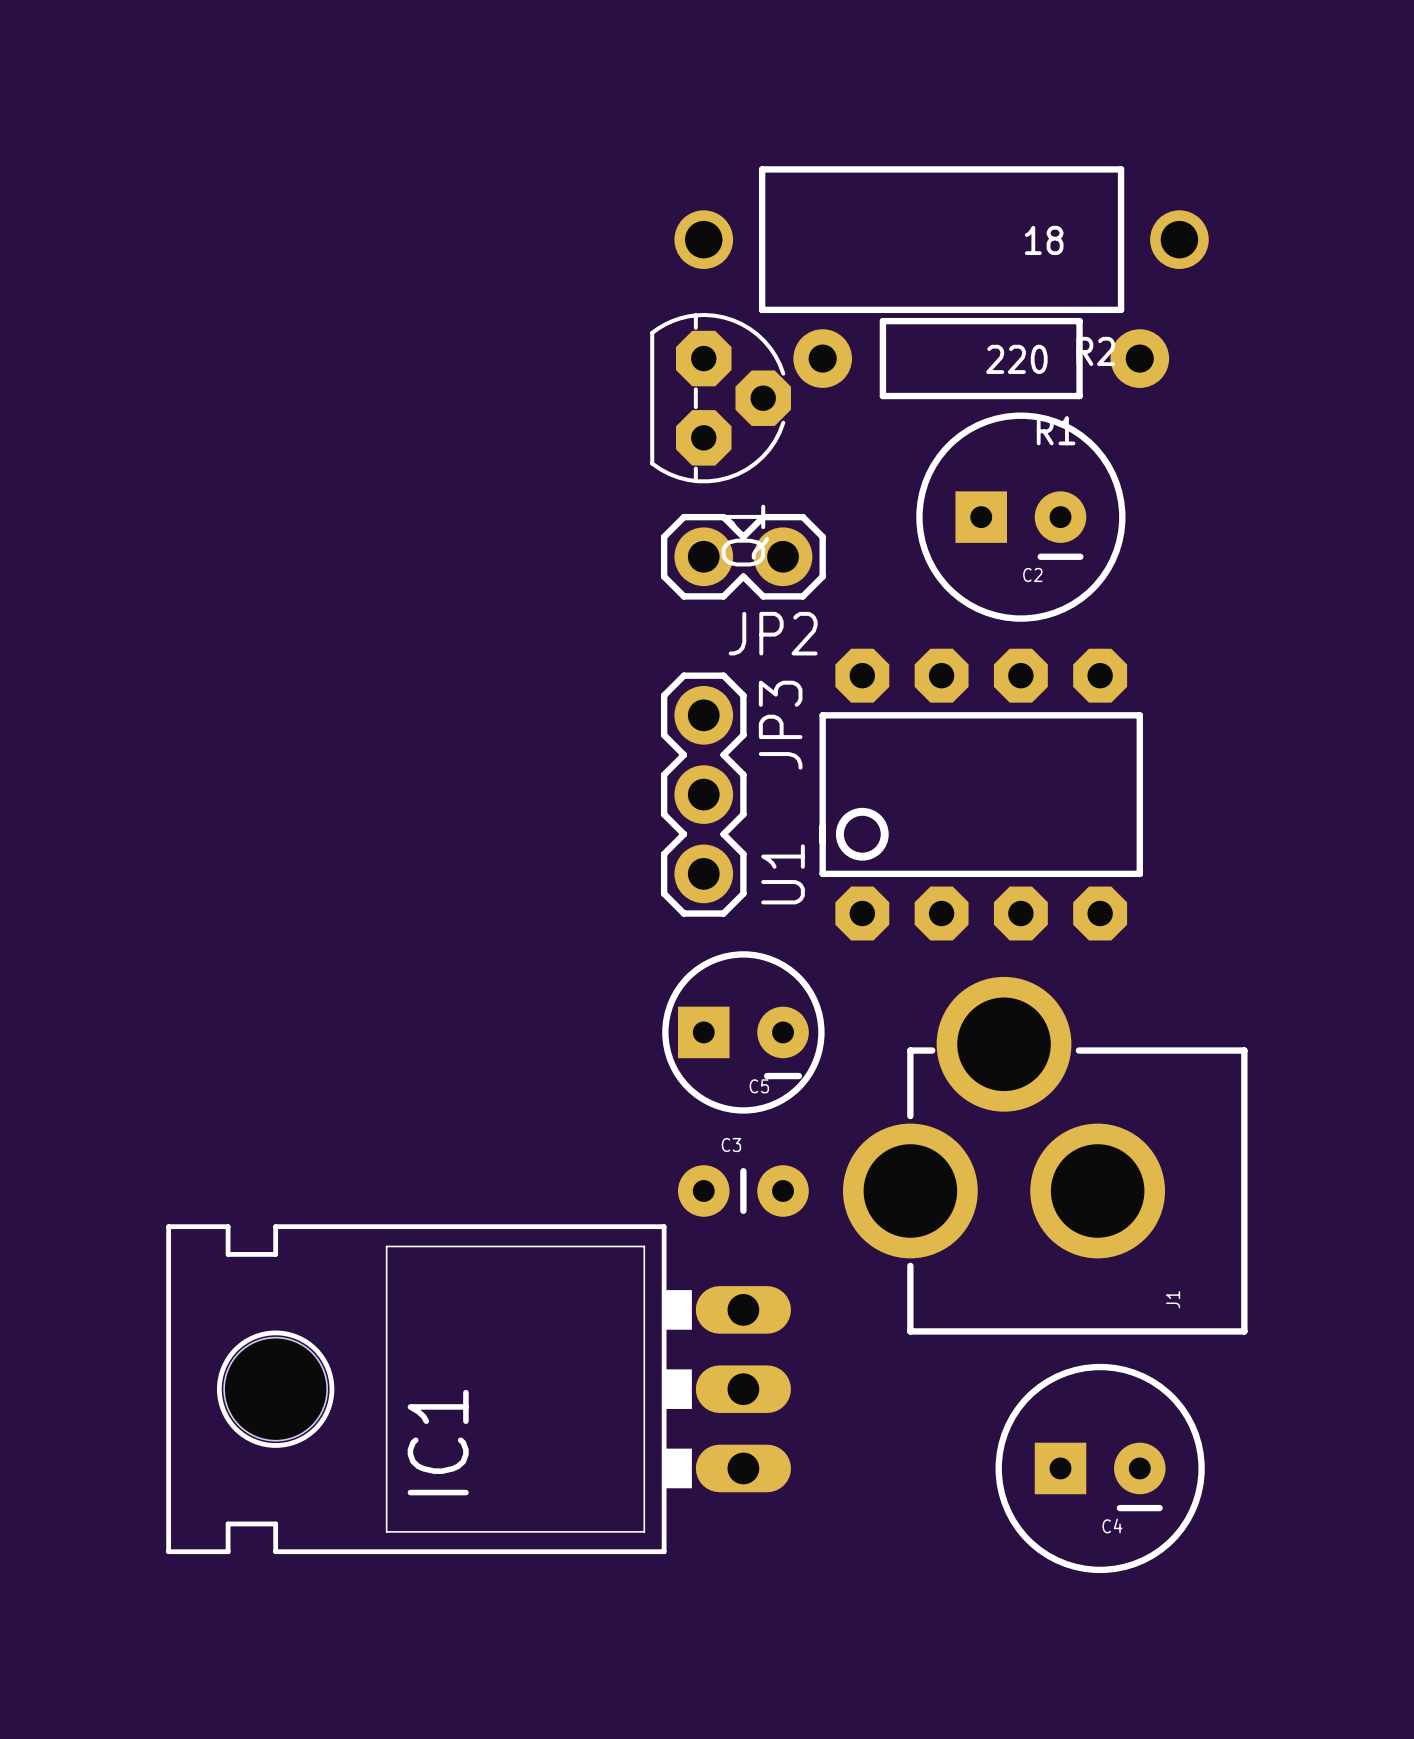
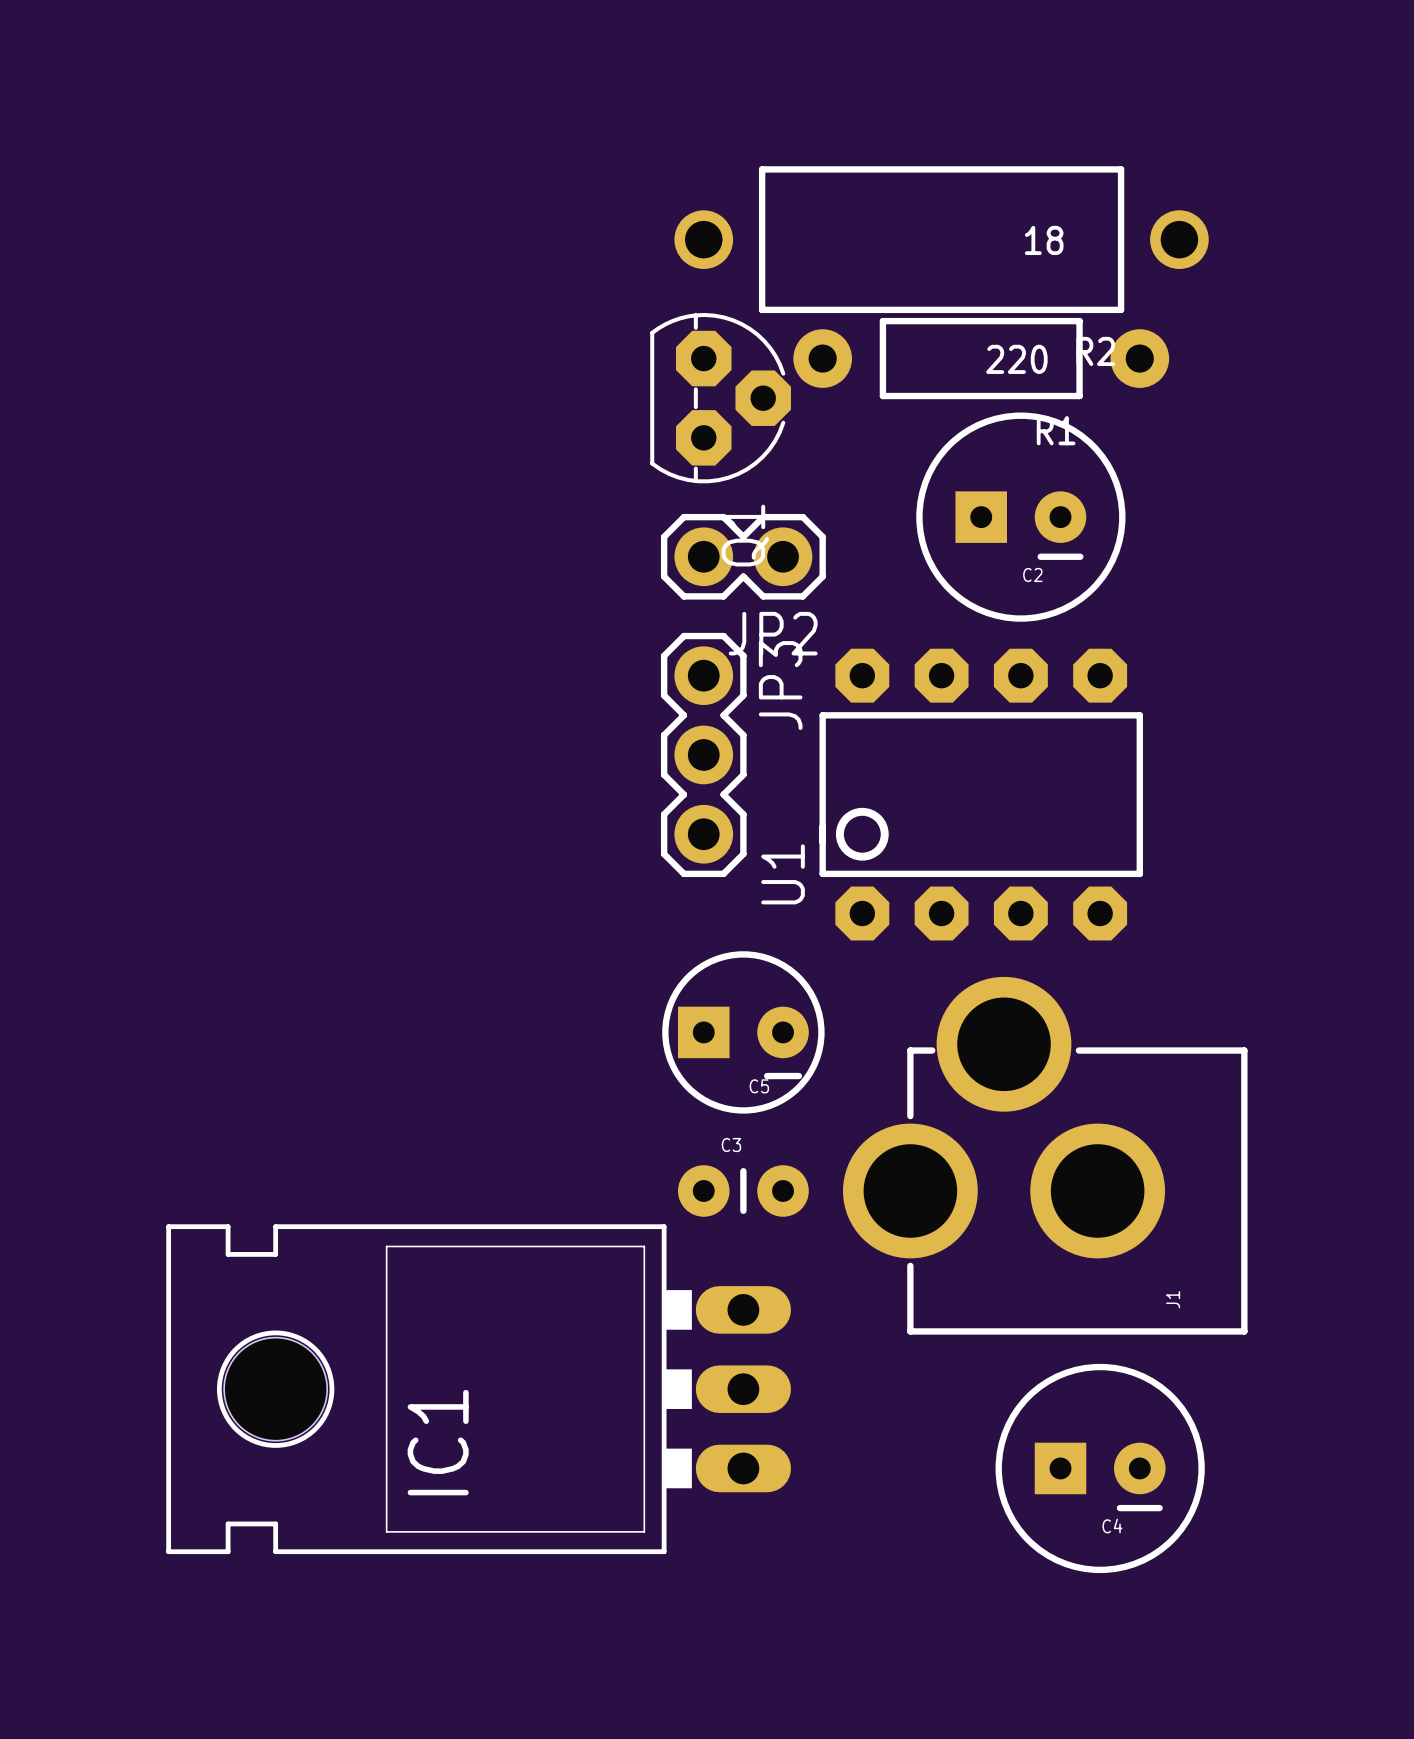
JP3 position: (703, 794) -> (703, 754)

